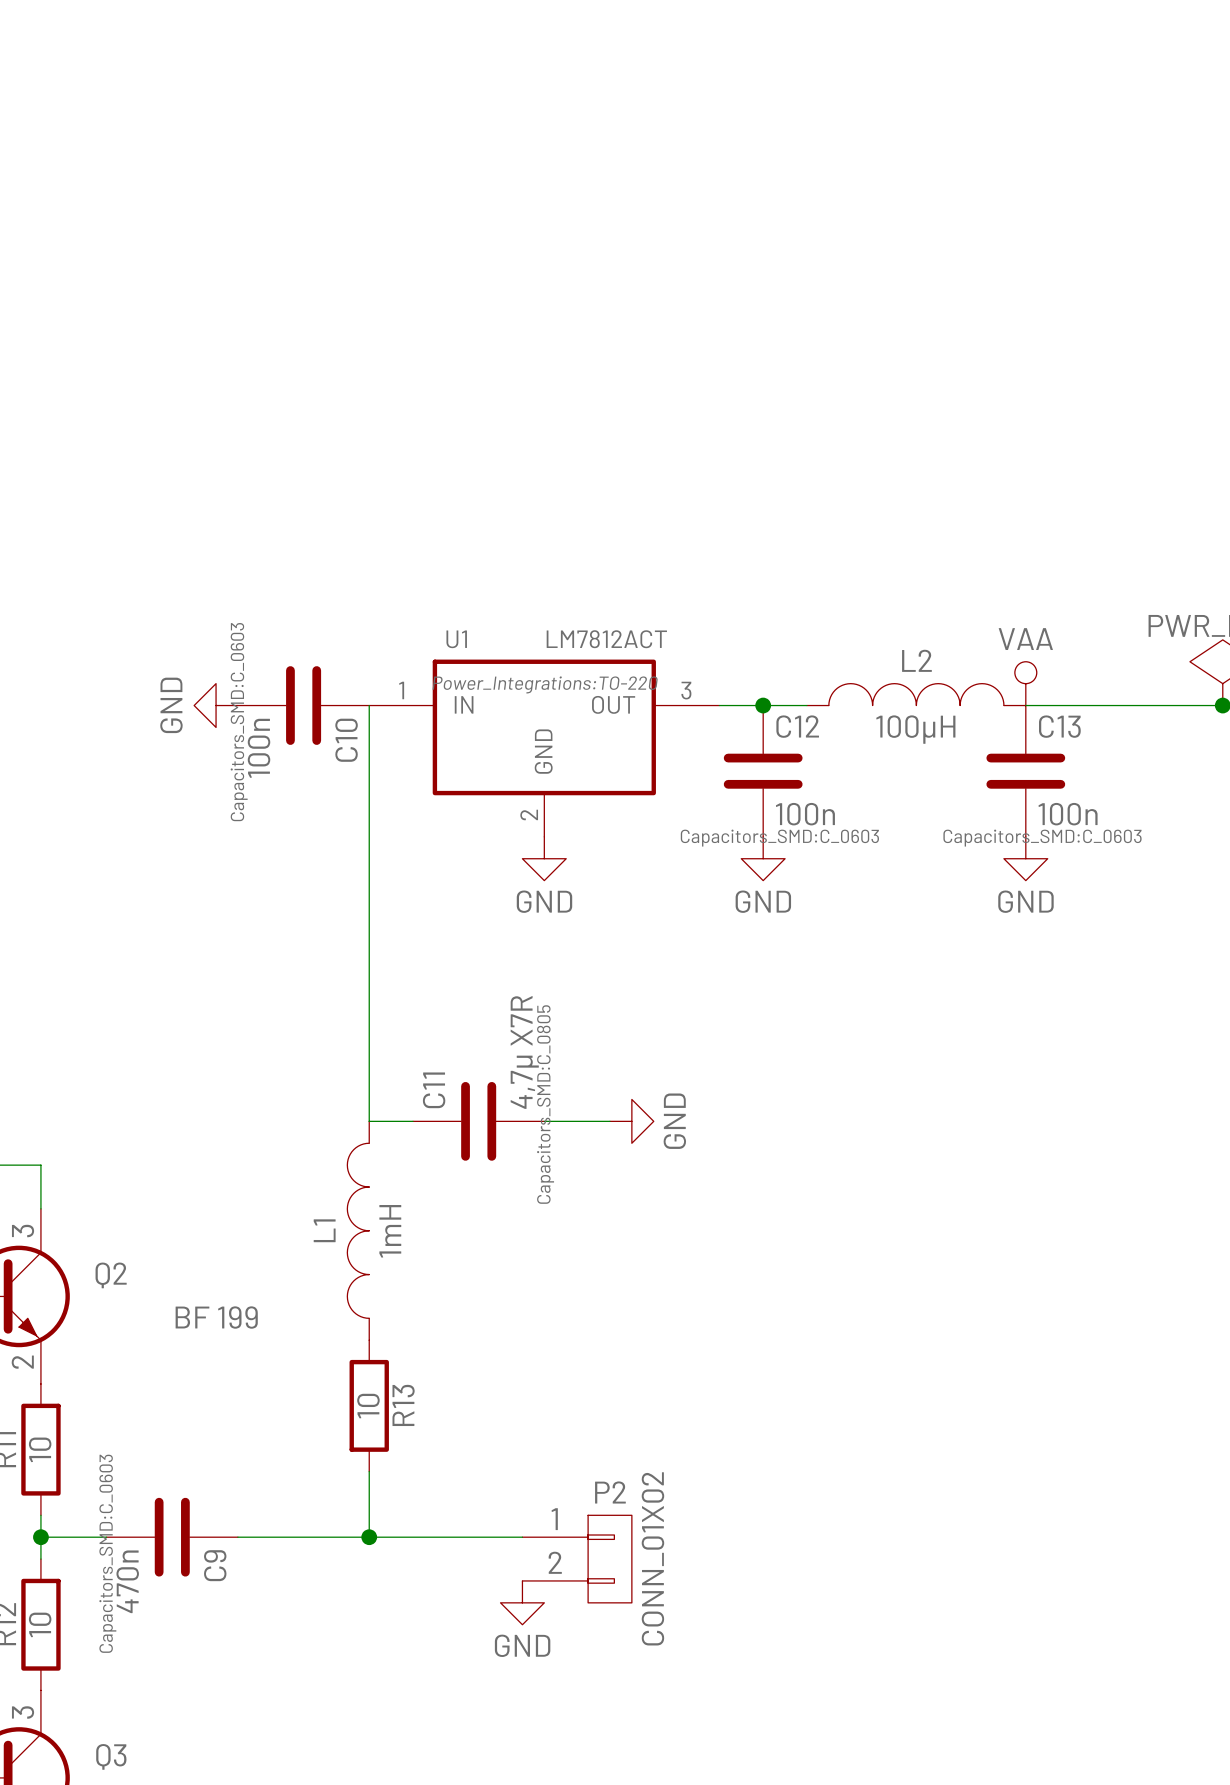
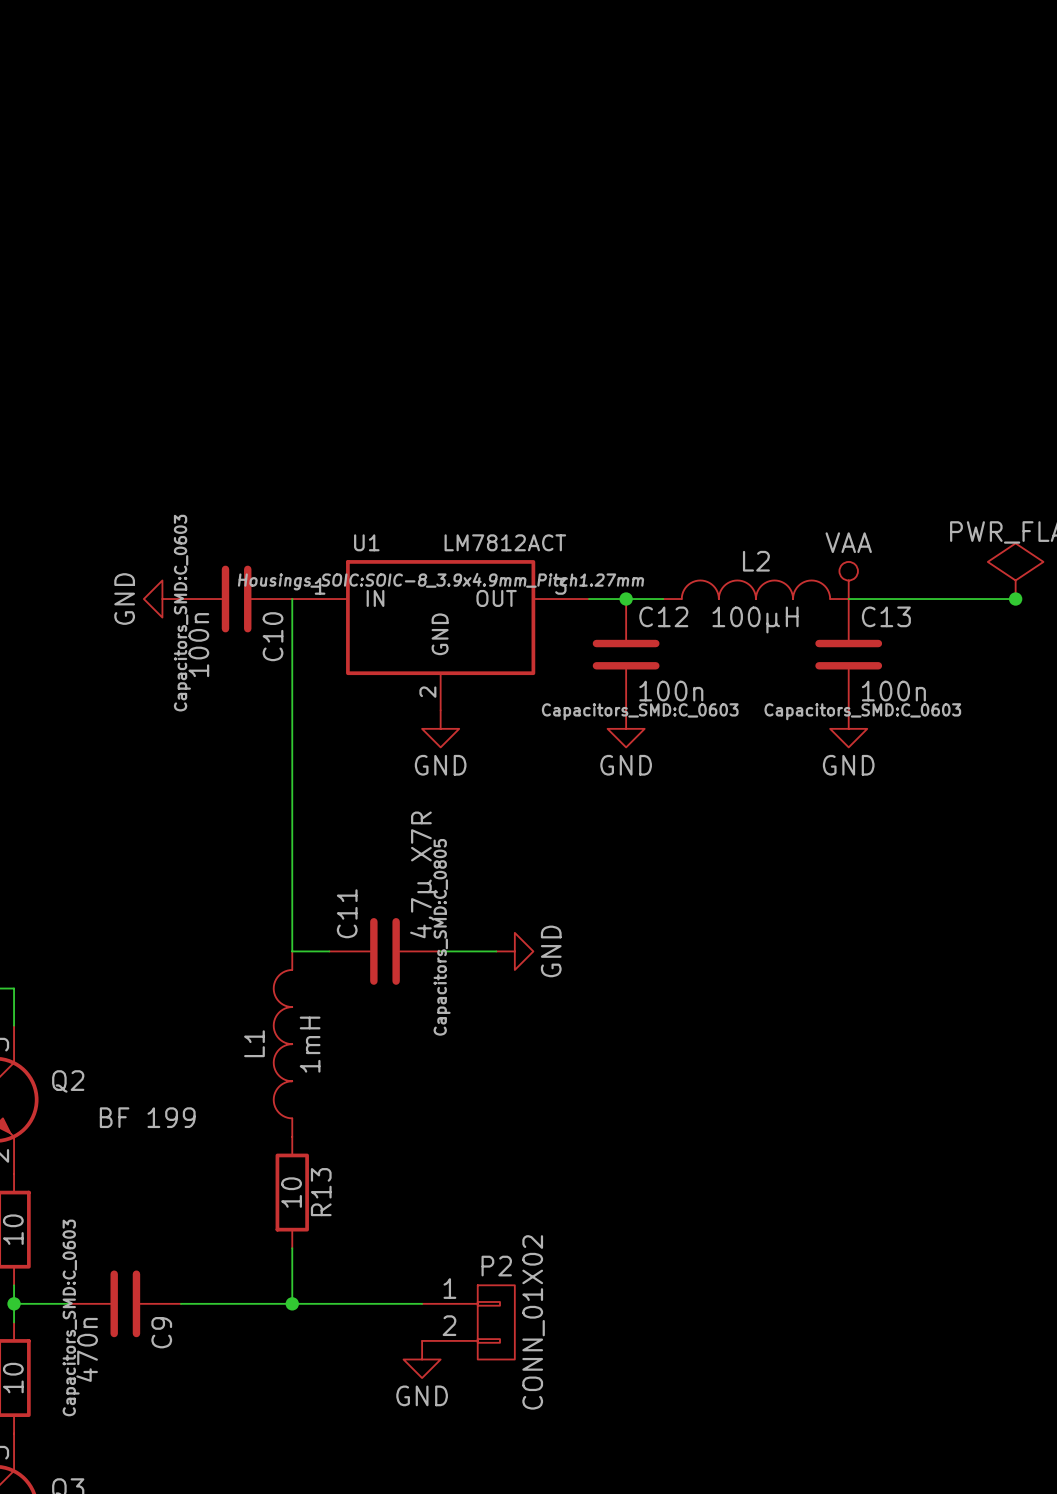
U1 text: Power_Integrations:TO-220 (545, 684) -> Housings_SOIC:SOIC-8_3.9x4.9mm_Pitch1.27mm (441, 581)

